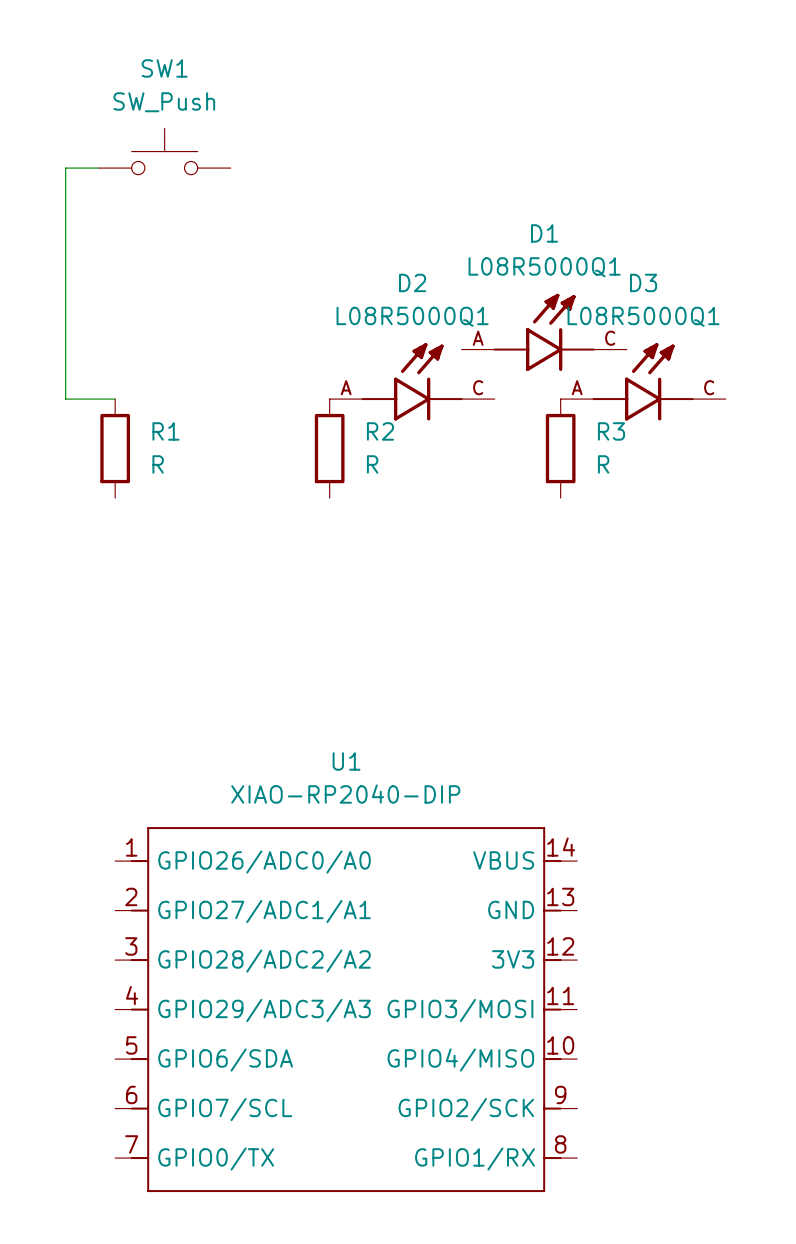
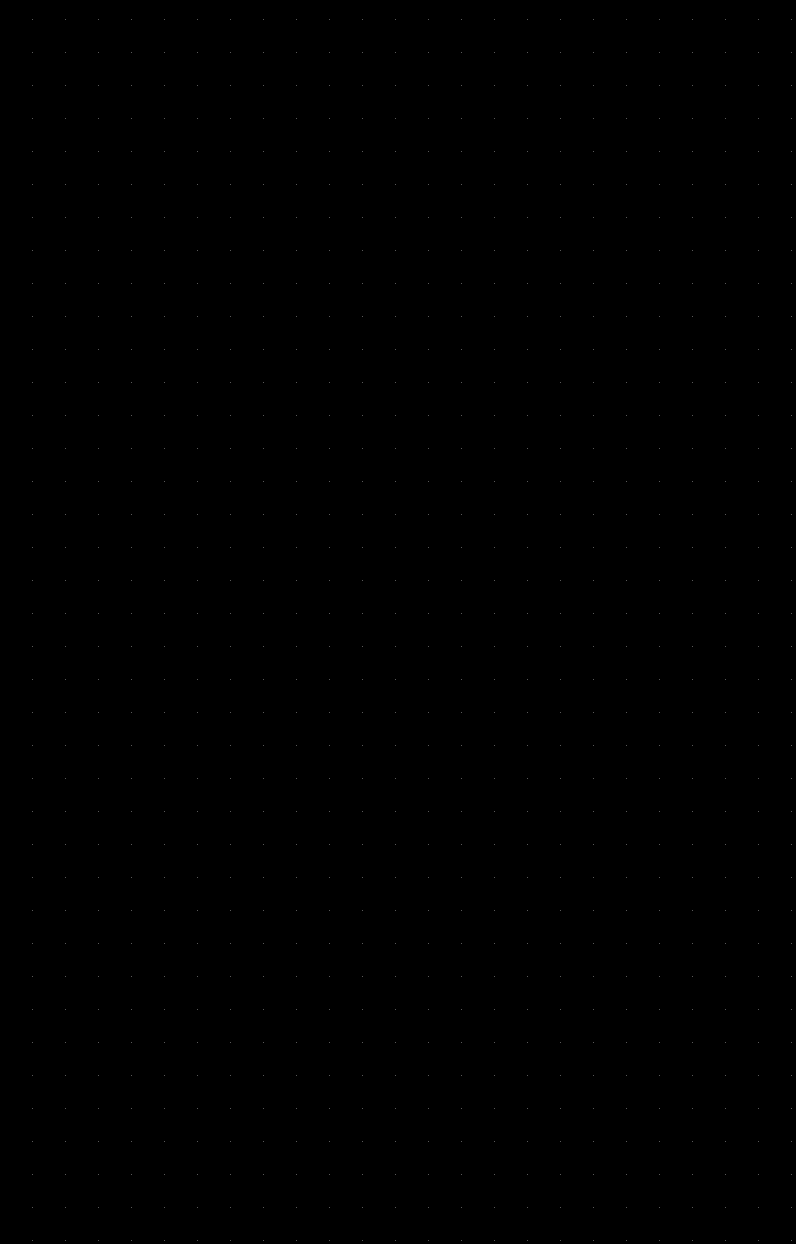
SW1: SW_Push (164, 151) -> none
wire: (98, 168) (65, 168) (65, 399) (115, 399) -> none
D1: L08R5000Q1 (544, 332) -> none
D2: L08R5000Q1 (412, 381) -> none
D3: L08R5000Q1 (643, 381) -> none
R1: R (115, 448) -> none
R2: R (329, 448) -> none
R3: R (560, 448) -> none
U1: XIAO-RP2040-DIP (346, 1009) -> none

